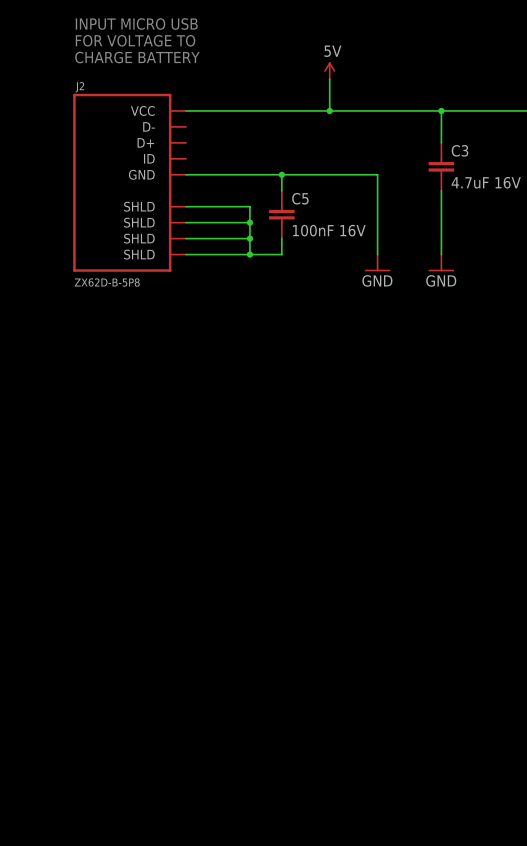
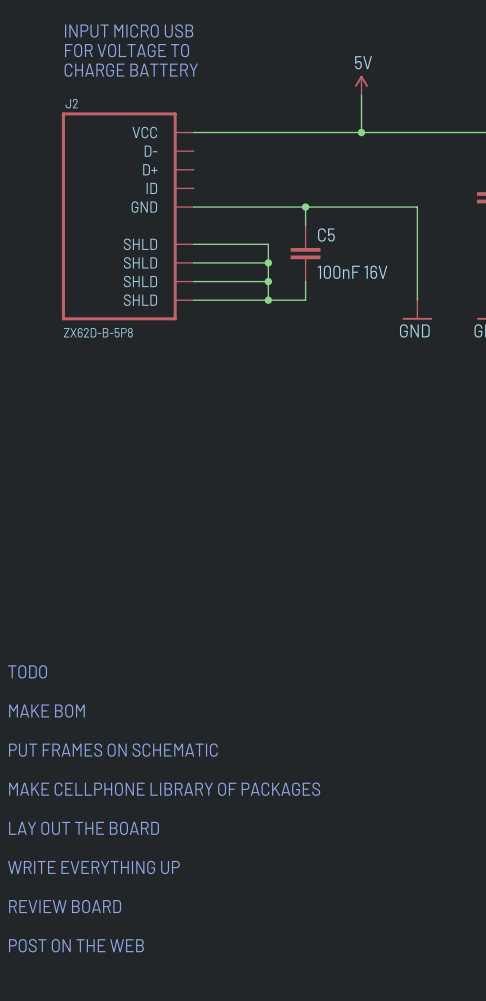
text: none -> TODO (27, 671)
text: none -> MAKE BOM (46, 710)
text: none -> PUT FRAMES ON SCHEMATIC (113, 750)
text: none -> MAKE CELLPHONE LIBRARY OF PACKAGES (164, 789)
text: none -> LAY OUT THE BOARD (84, 828)
text: none -> WRITE EVERYTHING UP (93, 867)
text: none -> REVIEW BOARD (65, 906)
text: none -> POST ON THE WEB (76, 945)

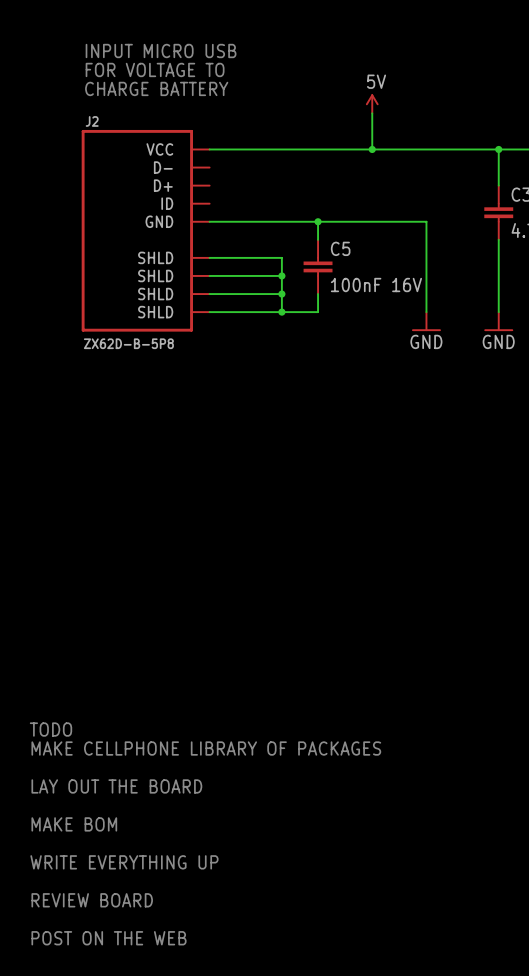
text position: TODO (27, 671) -> TODO (50, 729)
text: MAKE BOM (46, 710) -> none
text: PUT FRAMES ON SCHEMATIC (113, 750) -> MAKE CELLPHONE LIBRARY OF PACKAGES (206, 748)
text: MAKE CELLPHONE LIBRARY OF PACKAGES (164, 789) -> LAY OUT THE BOARD (116, 786)
text: LAY OUT THE BOARD (84, 828) -> MAKE BOM (74, 824)

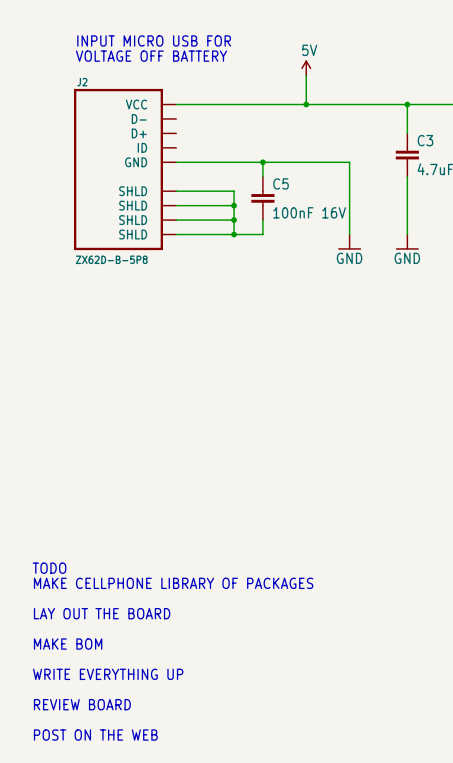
text: INPUT MICRO USB (161, 50) -> none
text: FOR VOLTAGE TO (155, 69) -> INPUT MICRO USB FOR (154, 40)
text: CHARGE BATTERY (156, 88) -> VOLTAGE OFF BATTERY (151, 56)

